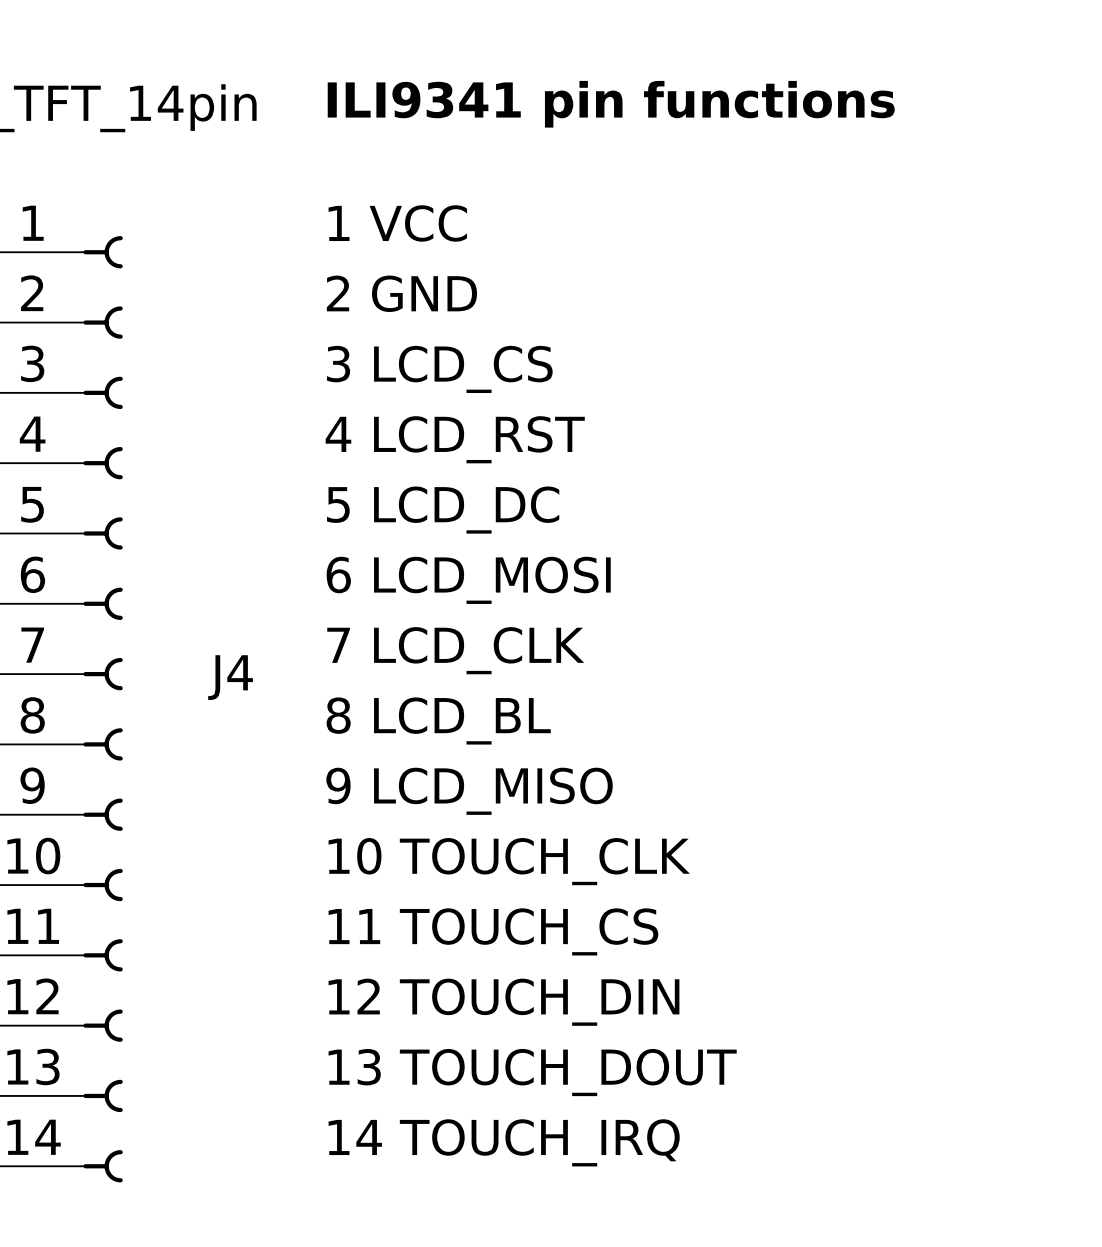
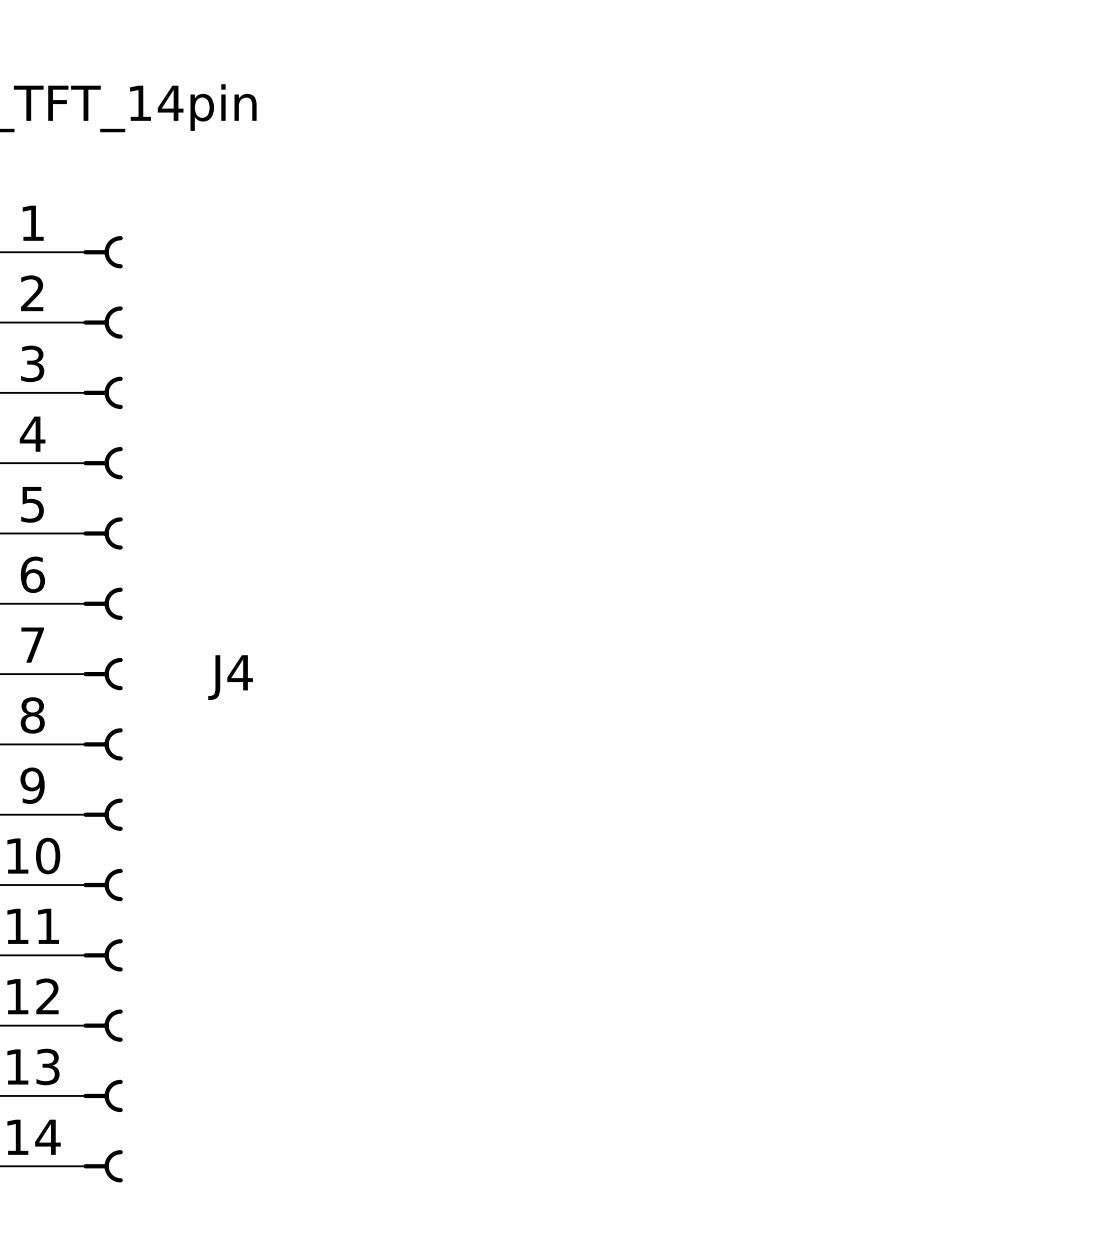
text: ILI9341 pin functions (611, 104) -> none
text: 1 VCC (397, 223) -> none
text: 2 GND (401, 293) -> none
text: 3 LCD_CS (439, 369) -> none
text: 4 LCD_RST (455, 439) -> none
text: 5 LCD_DC (443, 510) -> none
text: 6 LCD_MOSI (468, 580) -> none
text: 7 LCD_CLK (455, 650) -> none
text: 8 LCD_BL (438, 720) -> none
text: 9 LCD_MISO (469, 791) -> none
text: 10 TOUCH_CLK (509, 861) -> none
text: 11 TOUCH_CS (493, 931) -> none
text: 12 TOUCH_DIN (504, 1002) -> none
text: 13 TOUCH_DOUT (532, 1072) -> none
text: 14 TOUCH_IRQ (504, 1142) -> none

